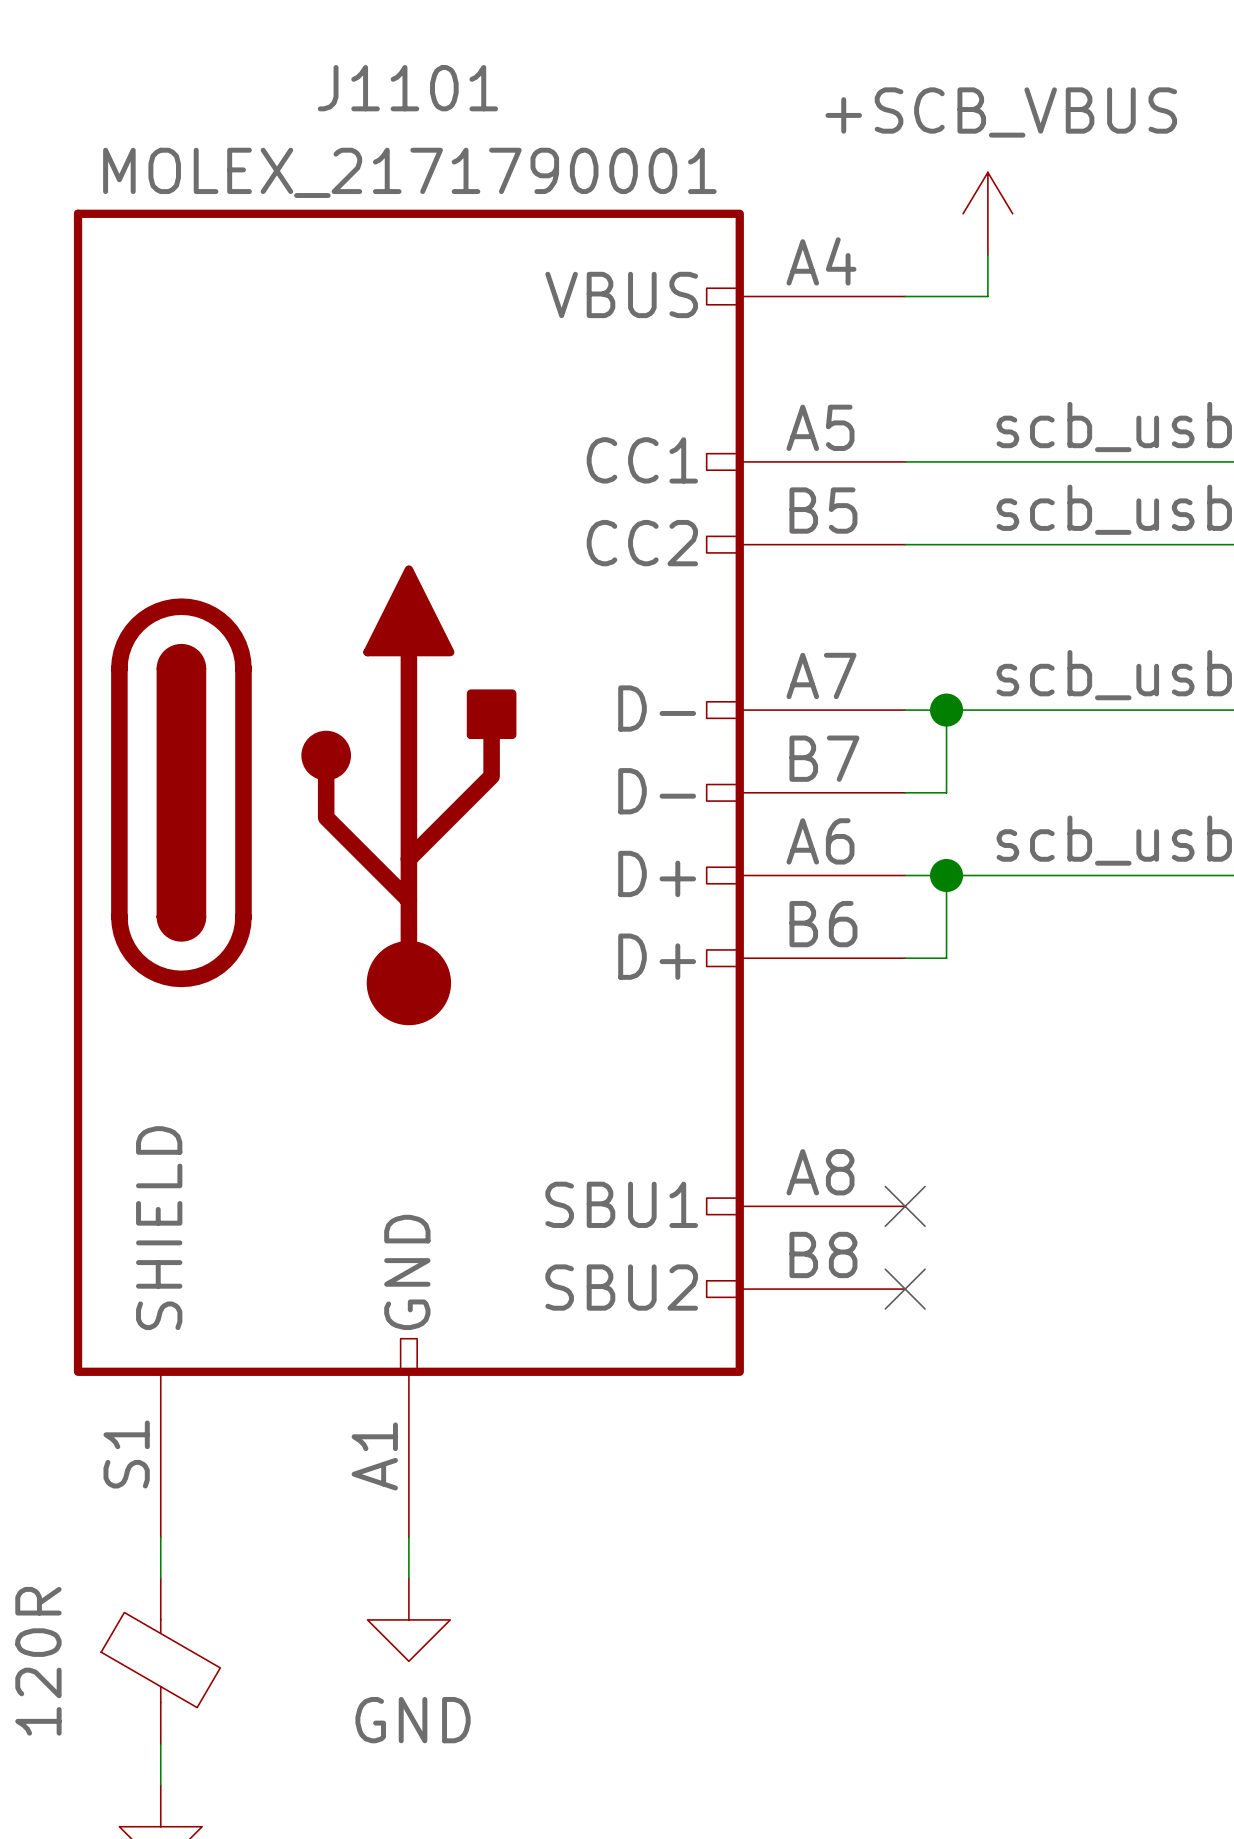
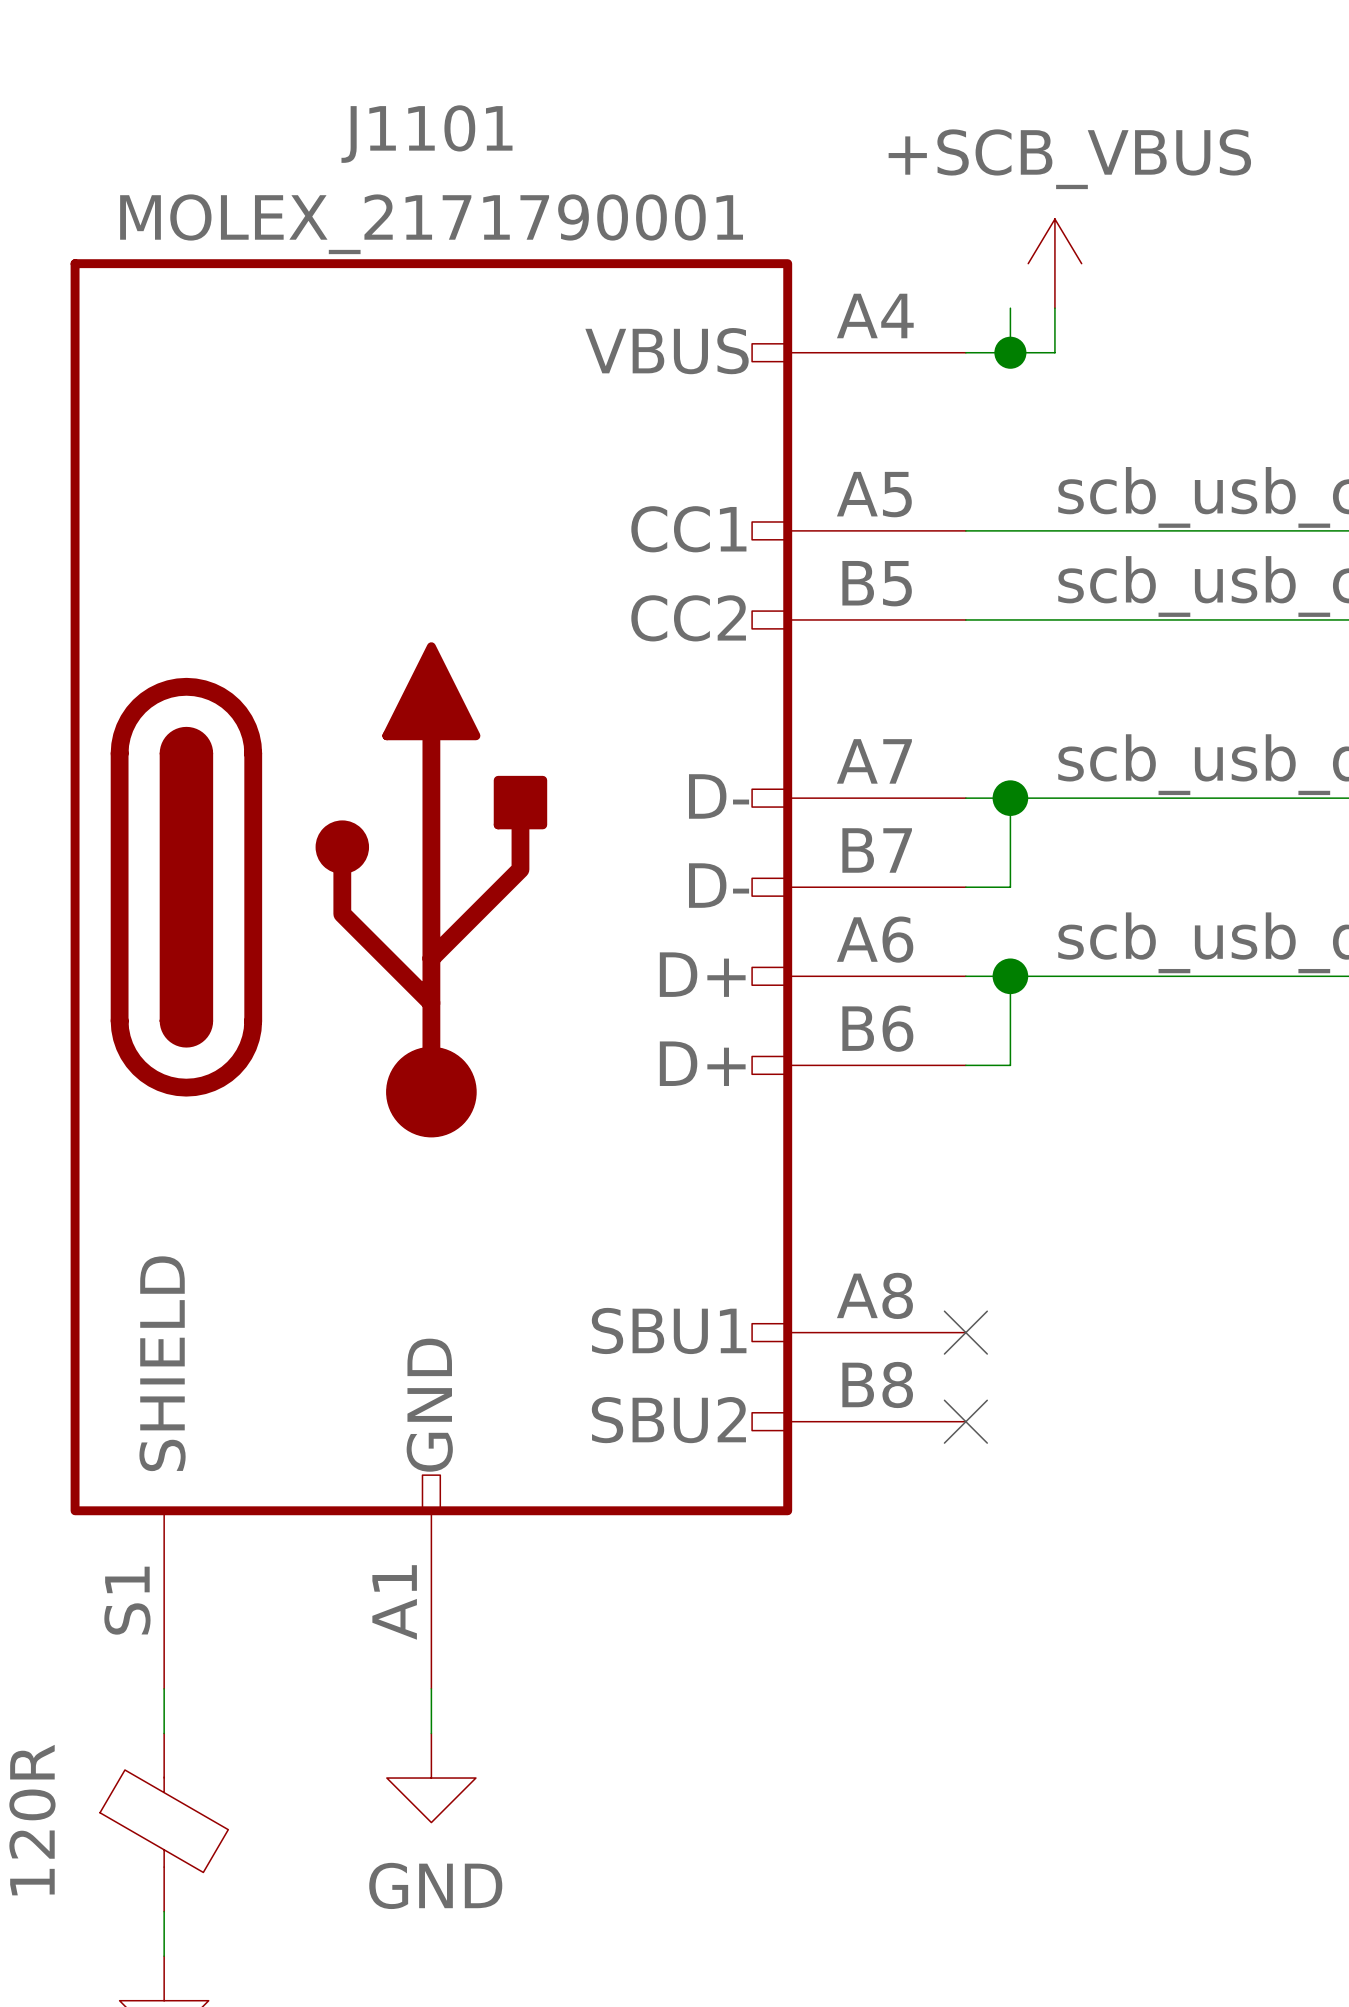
wire: none -> (1010, 308) (1010, 352)
junction: none -> (1010, 352)

